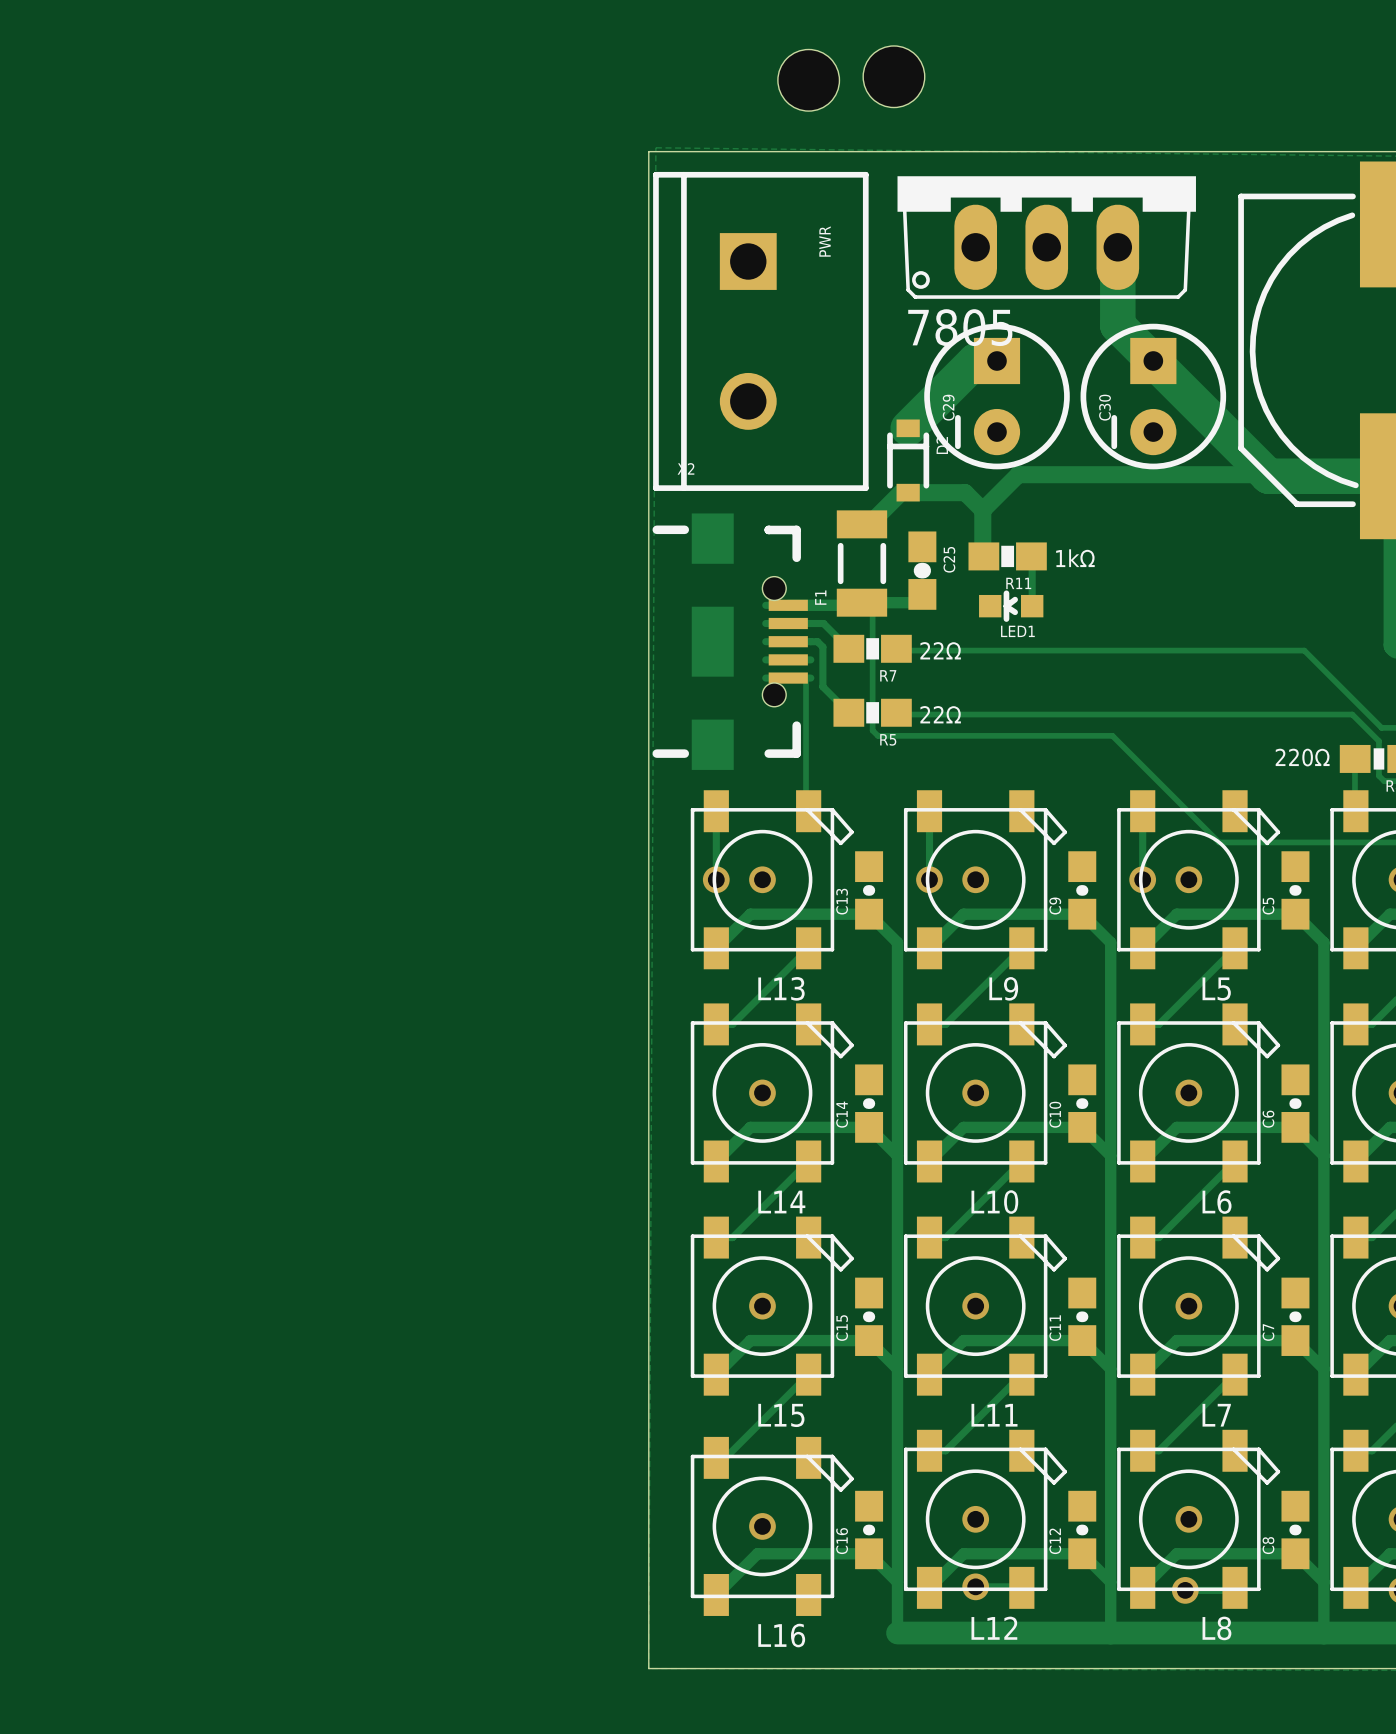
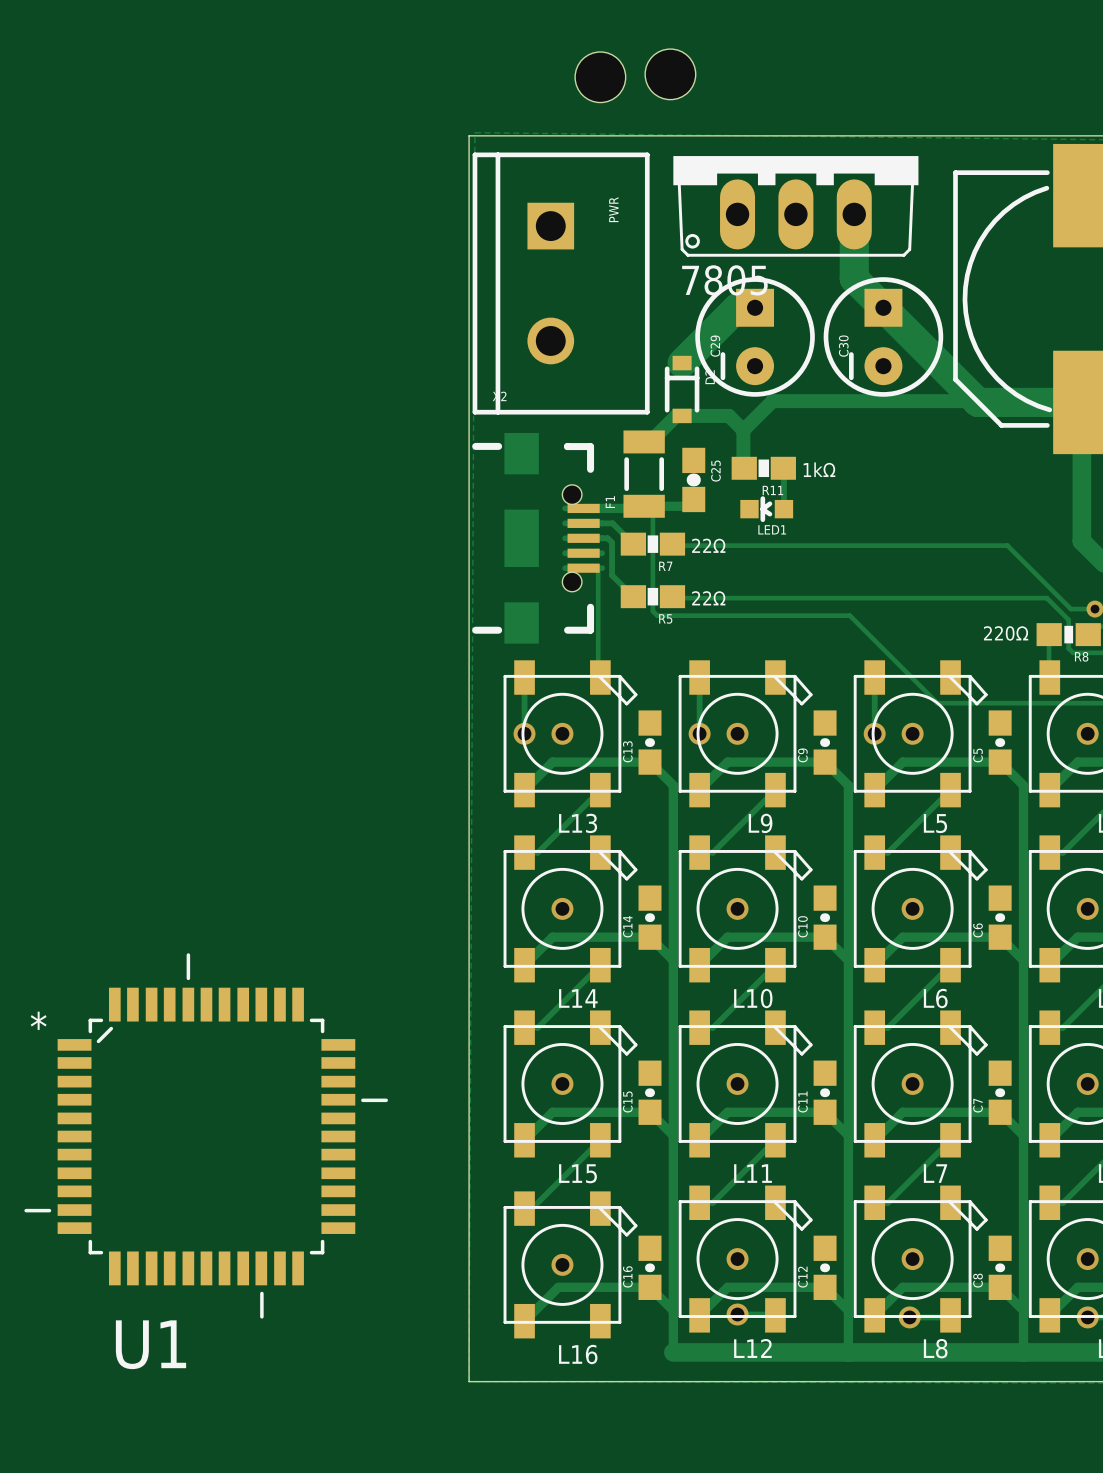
U1: none -> (206, 1135)

